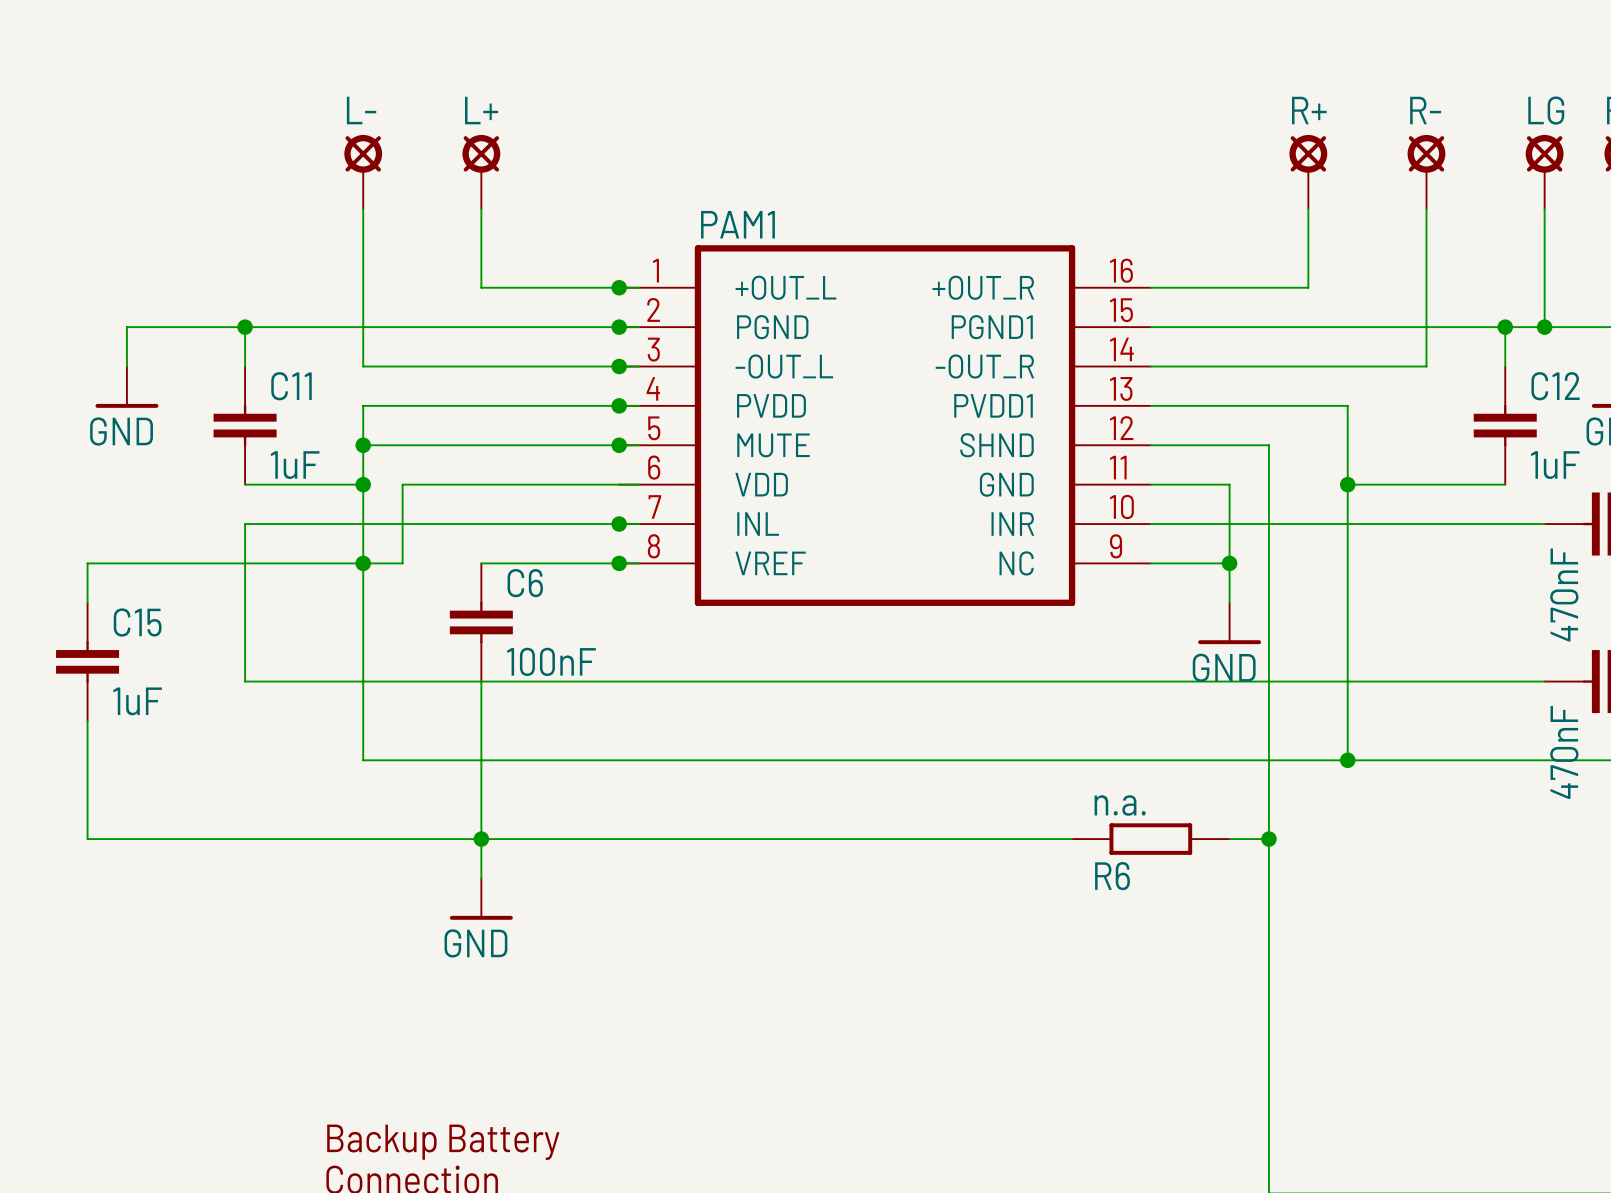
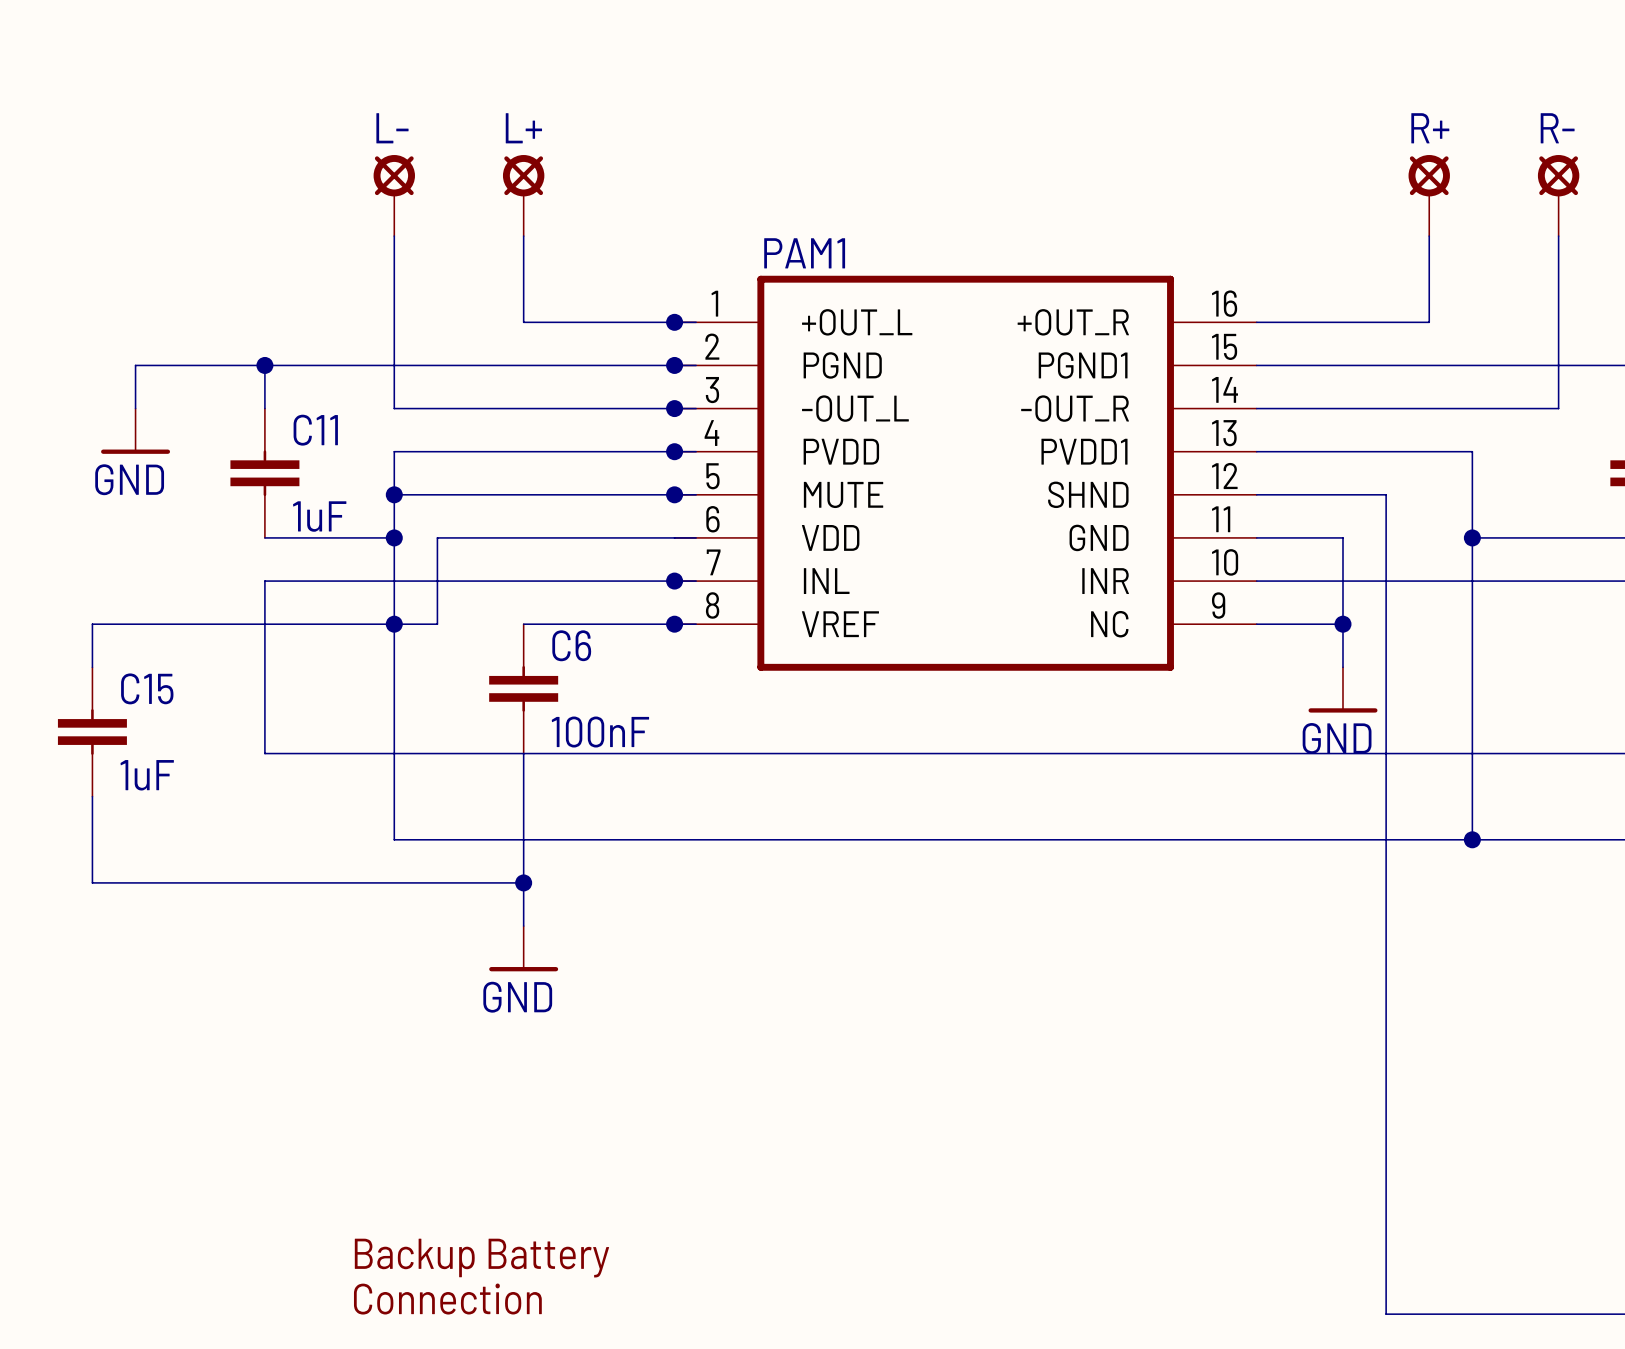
wire: (87, 799) (87, 839) (1072, 839) -> (92, 882) (523, 882)
junction position: (481, 839) -> (523, 882)
R6: n.a. (1150, 839) -> none
wire: (1229, 839) (1268, 839) -> none
junction: (1268, 839) -> none
power symbol position: GND (481, 899) -> GND (523, 948)

